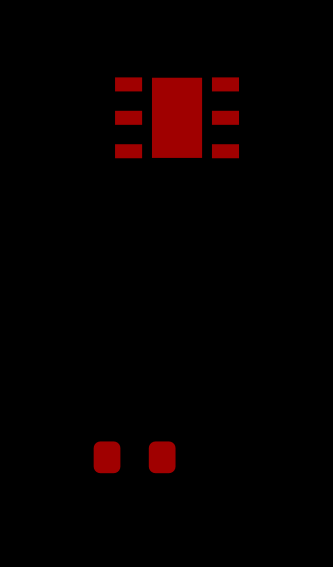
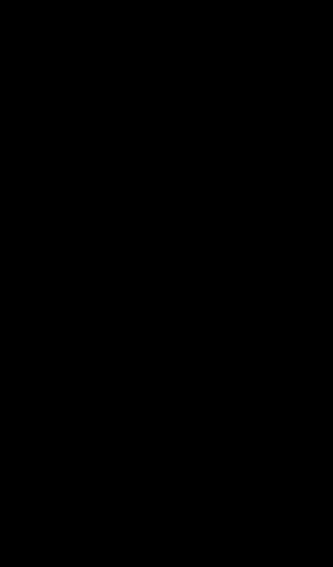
part: (177, 117) -> none
part: (134, 457) -> none

